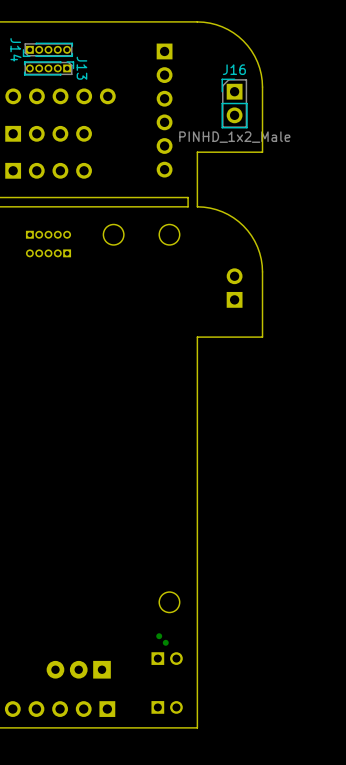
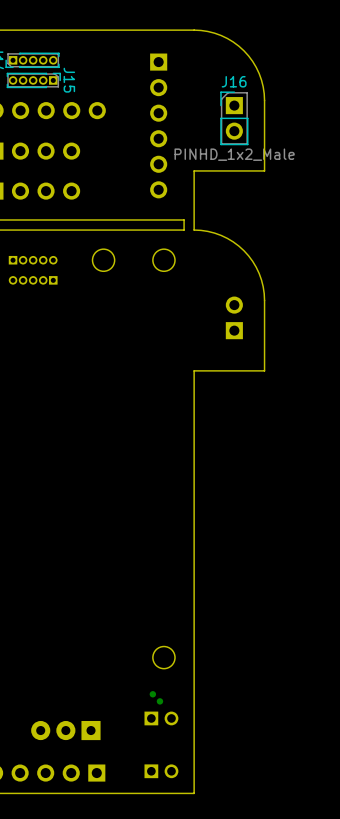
J13 name: J13 (81, 68) -> J15 (69, 80)

